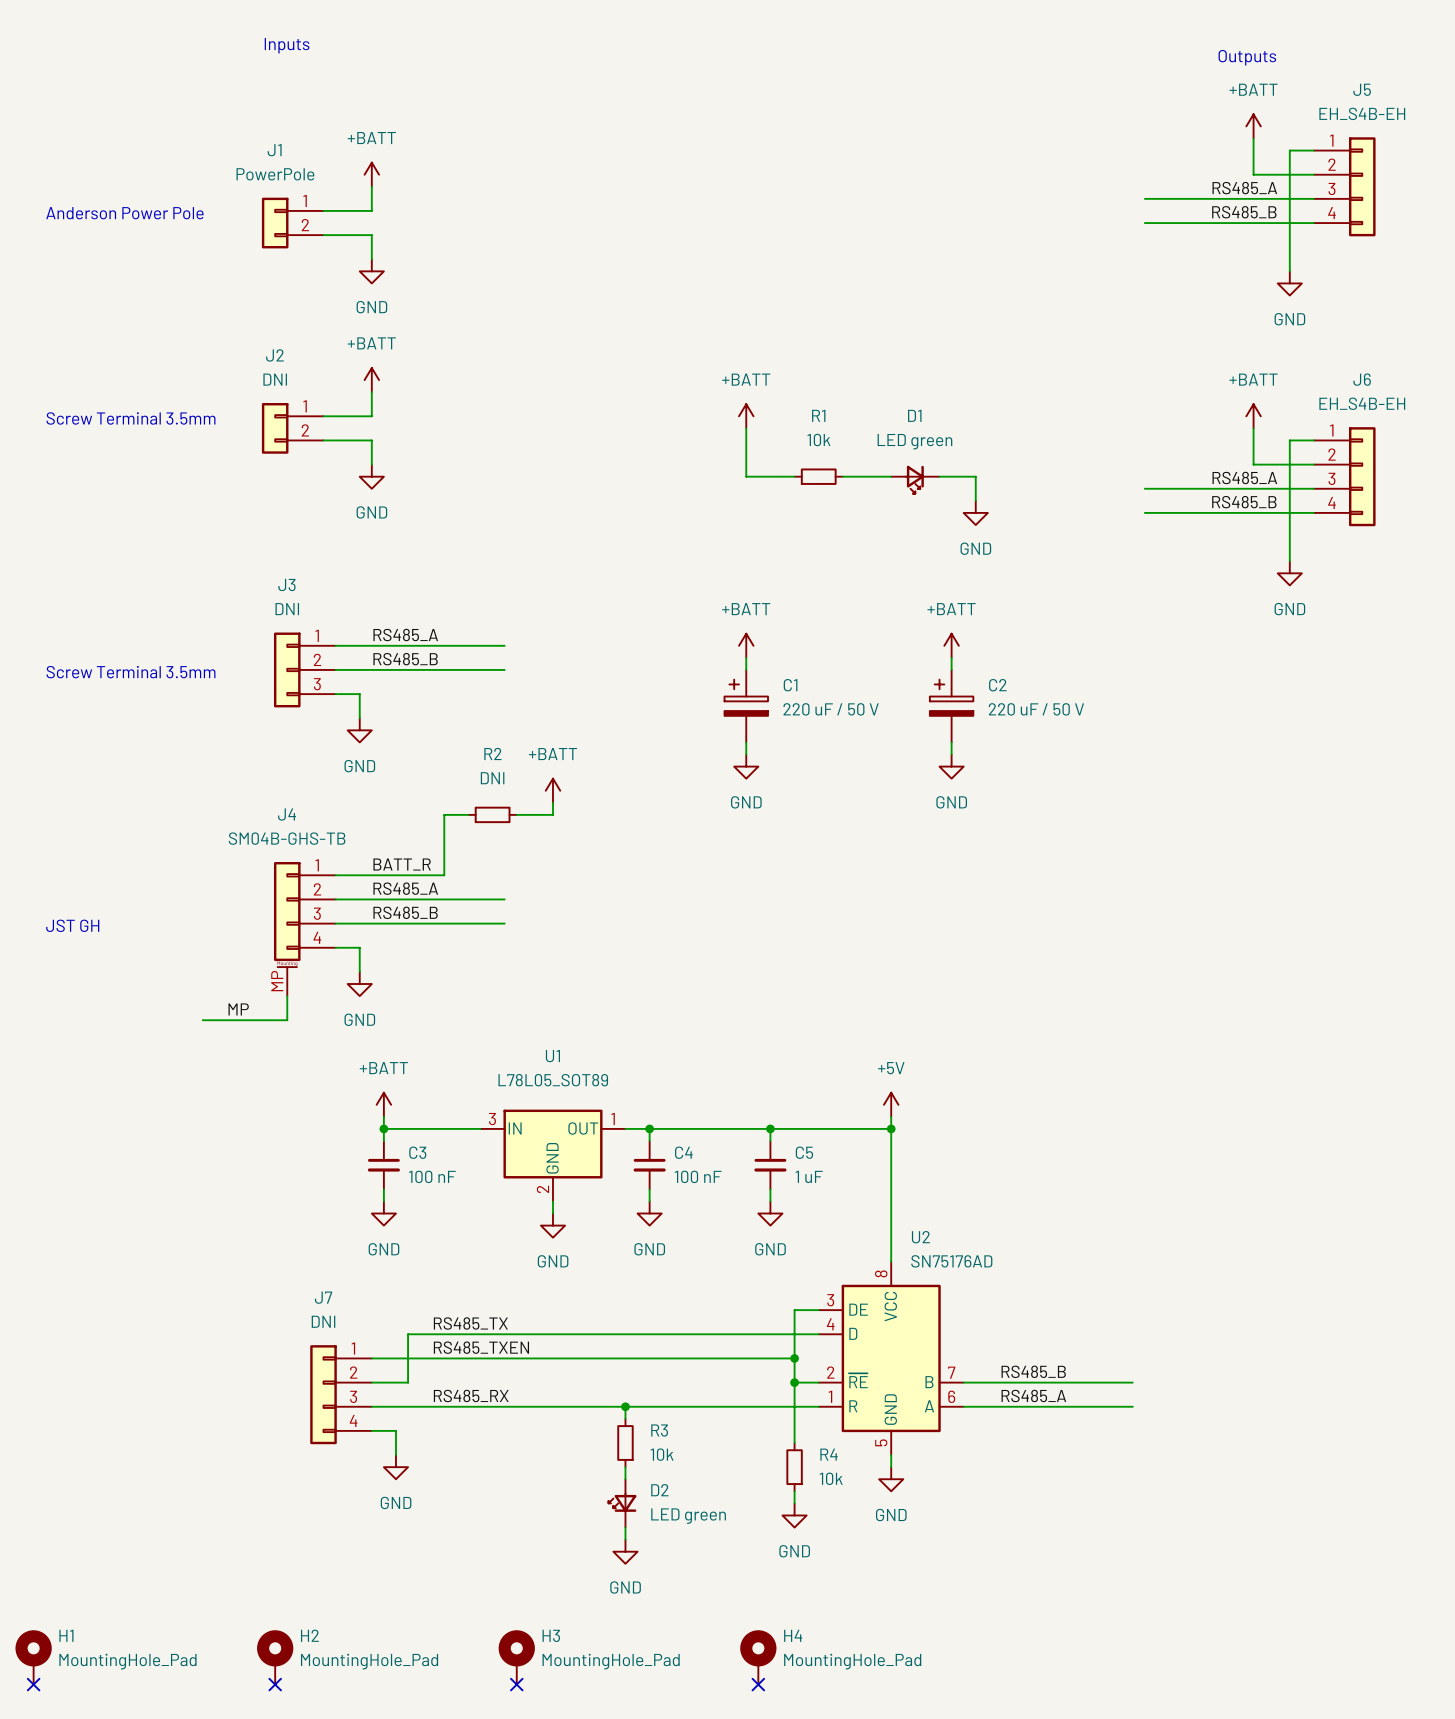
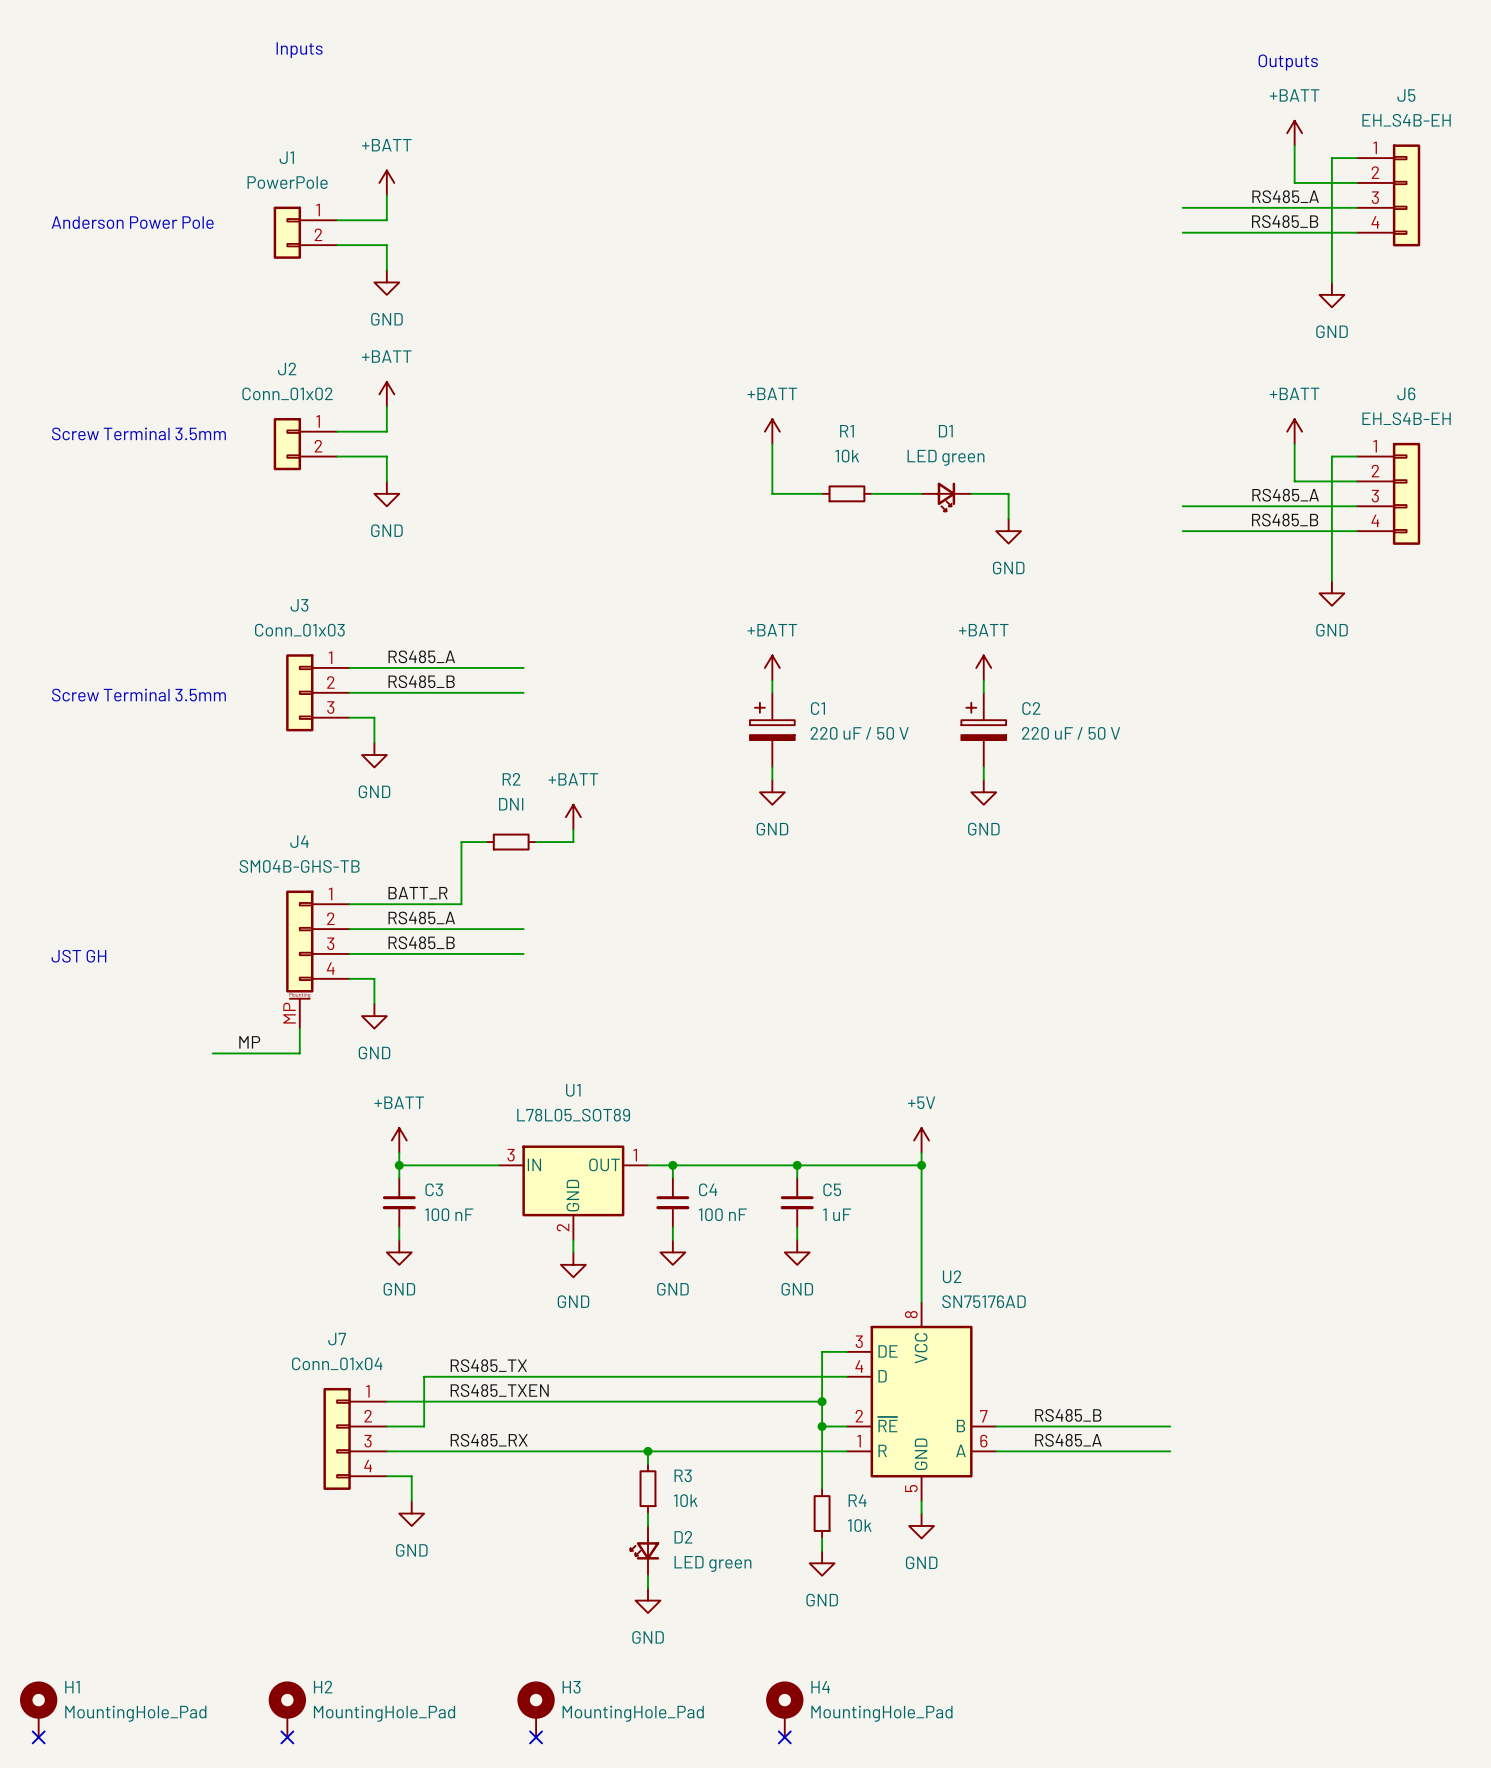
J2 value: DNI (275, 379) -> Conn_01x02 (287, 393)
J3 value: DNI (287, 609) -> Conn_01x03 (299, 630)
J7 value: DNI (323, 1321) -> Conn_01x04 (337, 1363)

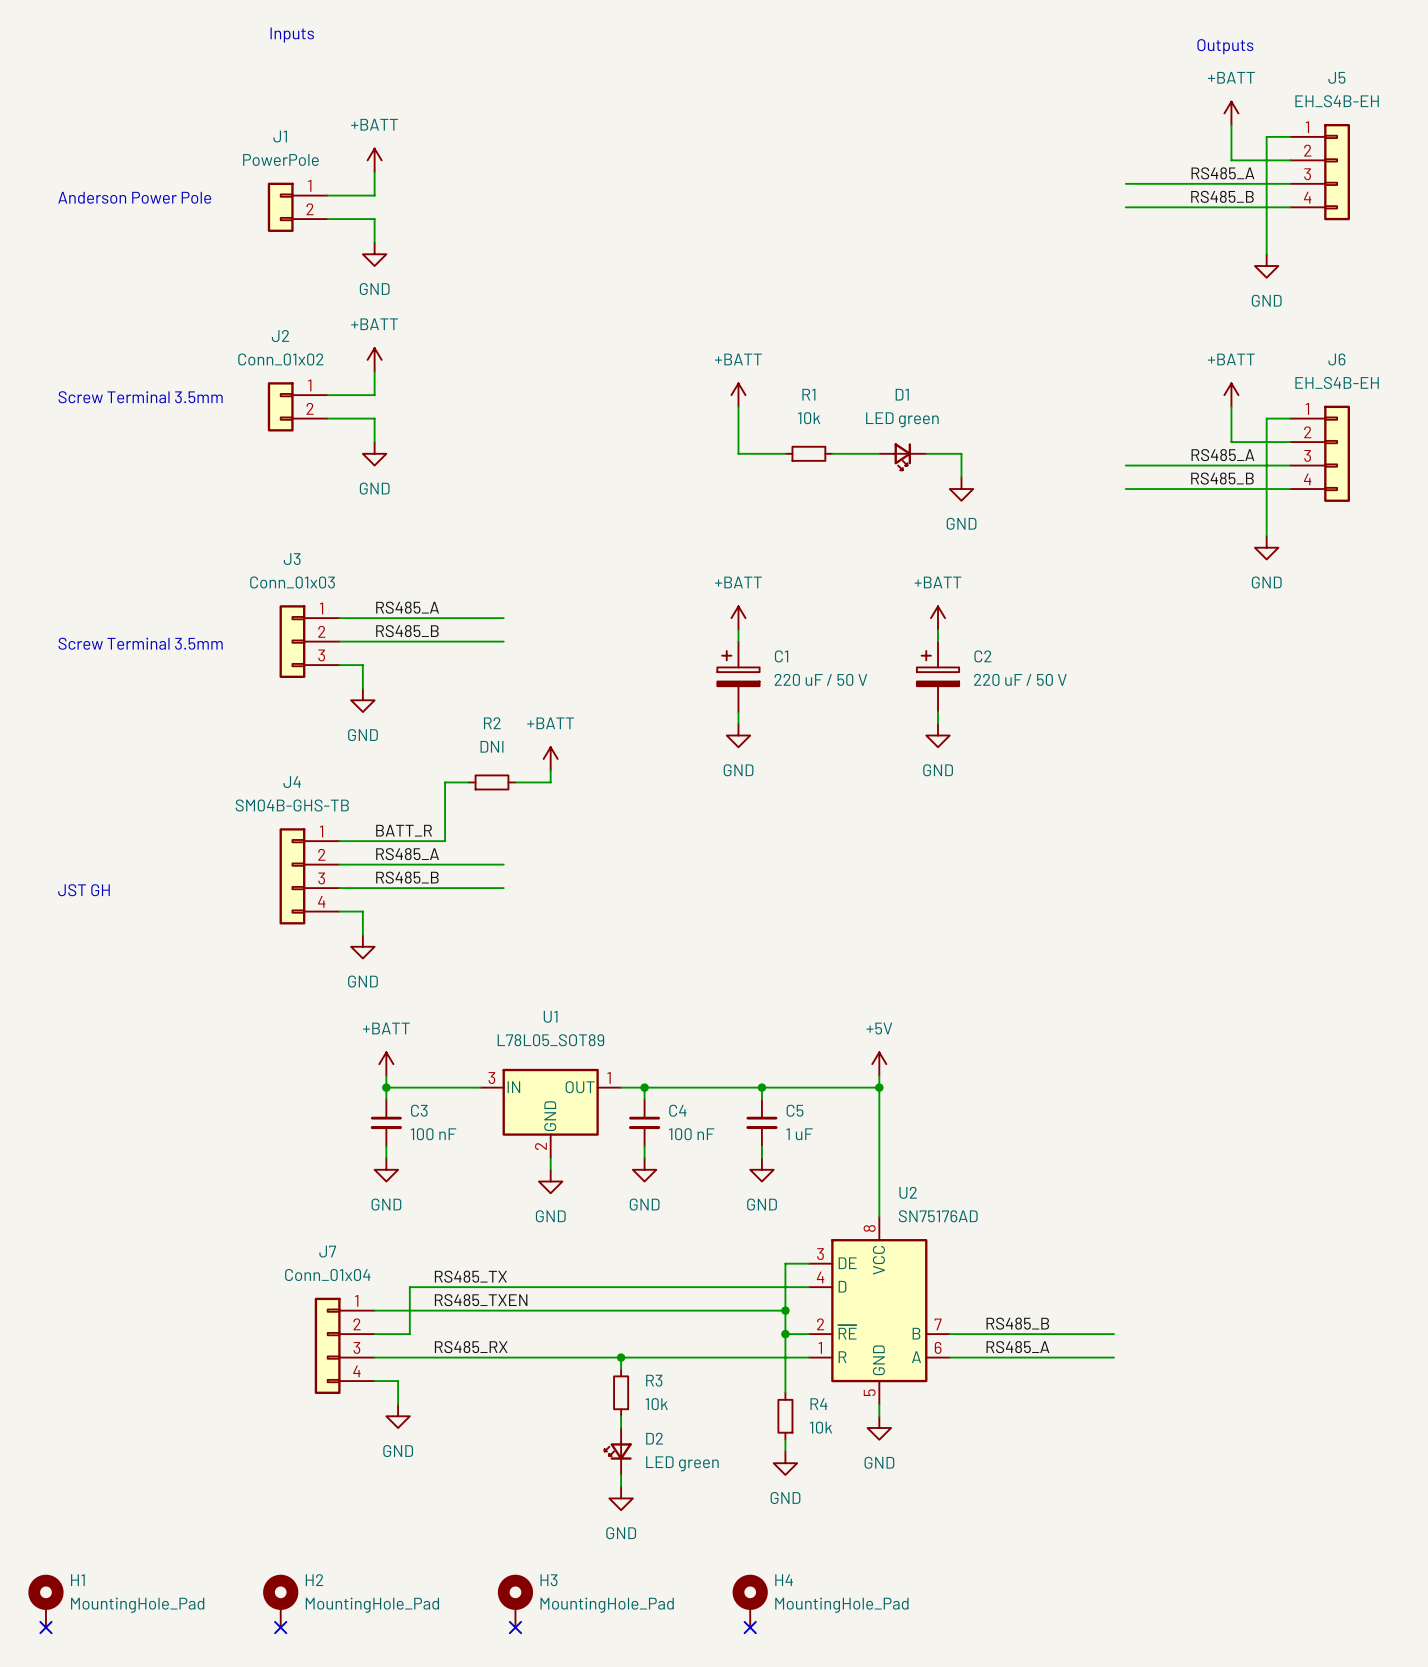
J4 symbol: [286, 890, 350, 1029] -> [279, 828, 340, 925]
wire: (299, 1028) (299, 1053) (212, 1053) -> none
label: MP (249, 1042) -> none

